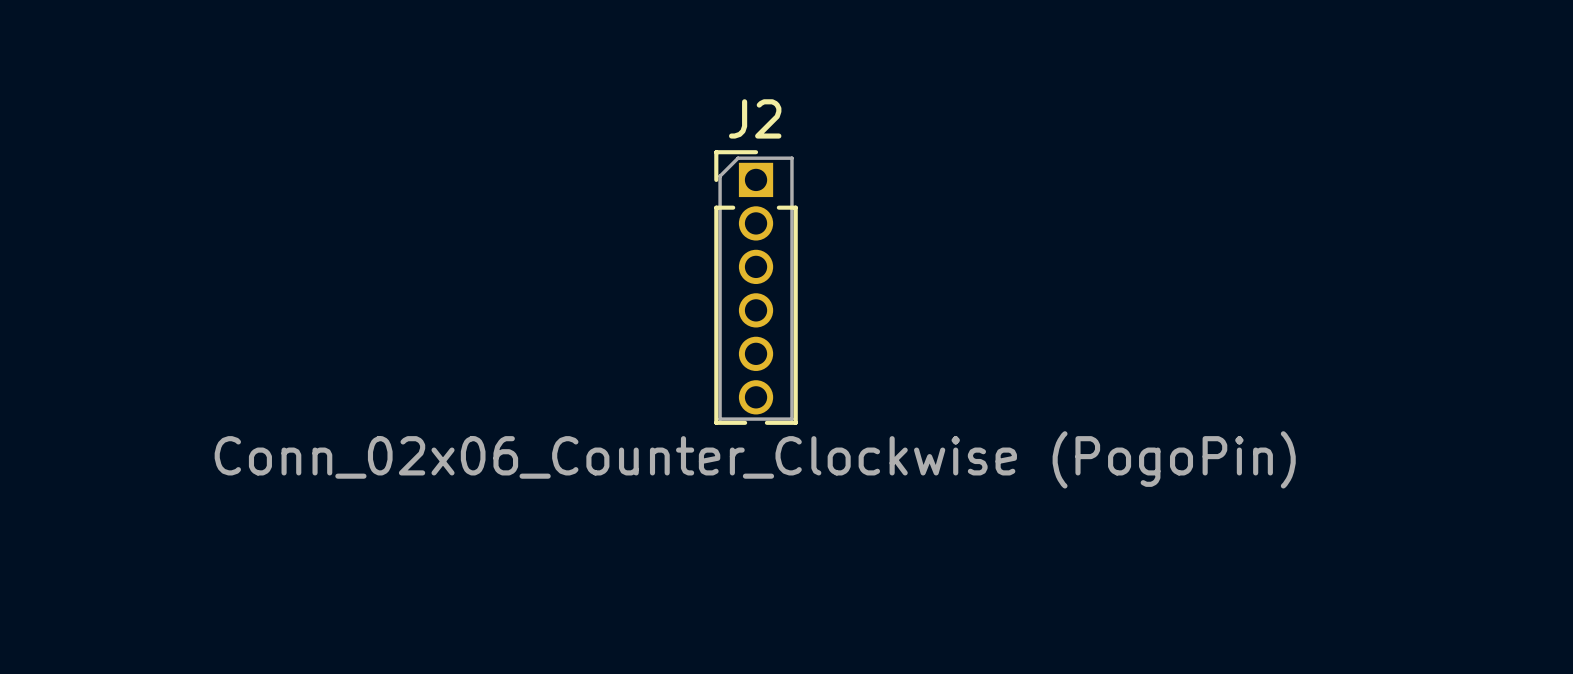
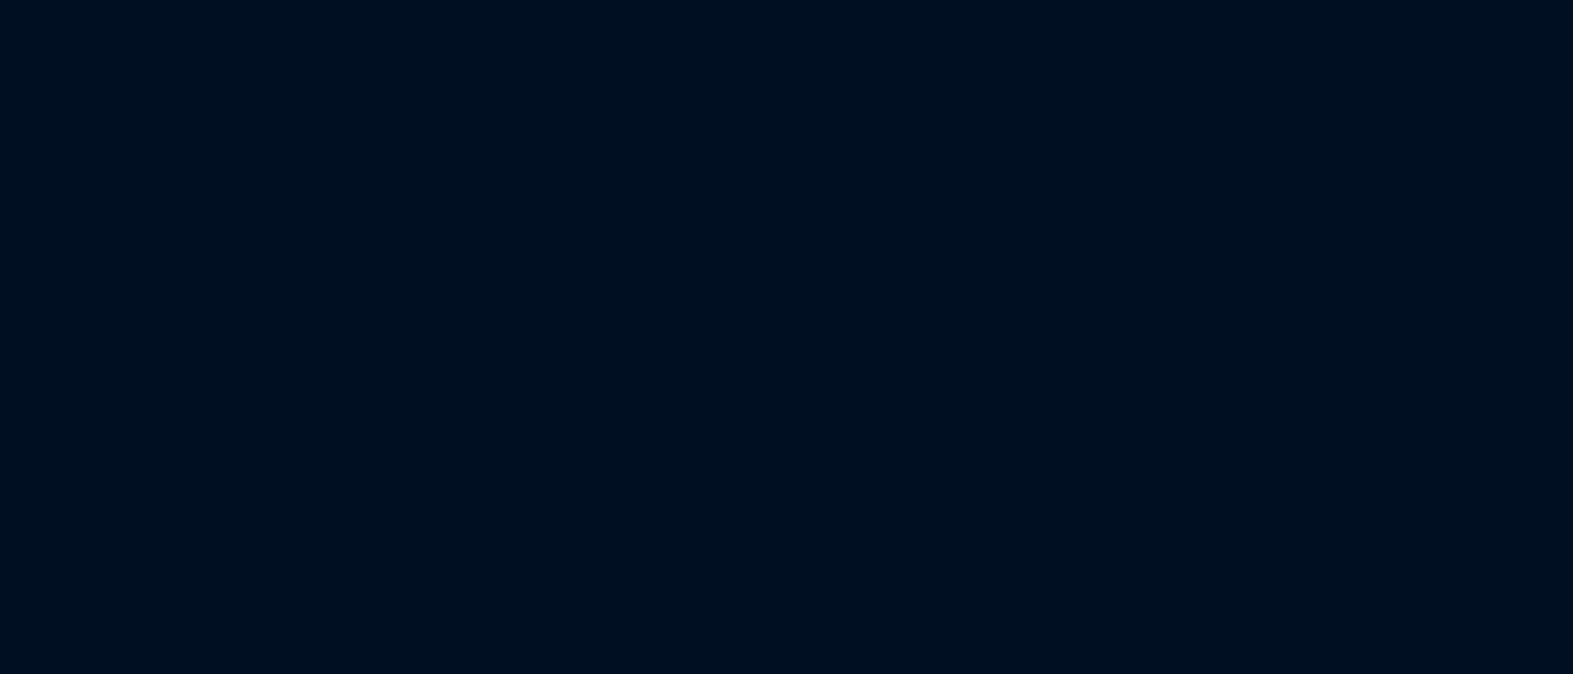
J2: Conn_02x06_Counter_Clockwise (PogoPin) (756, 287) -> none

